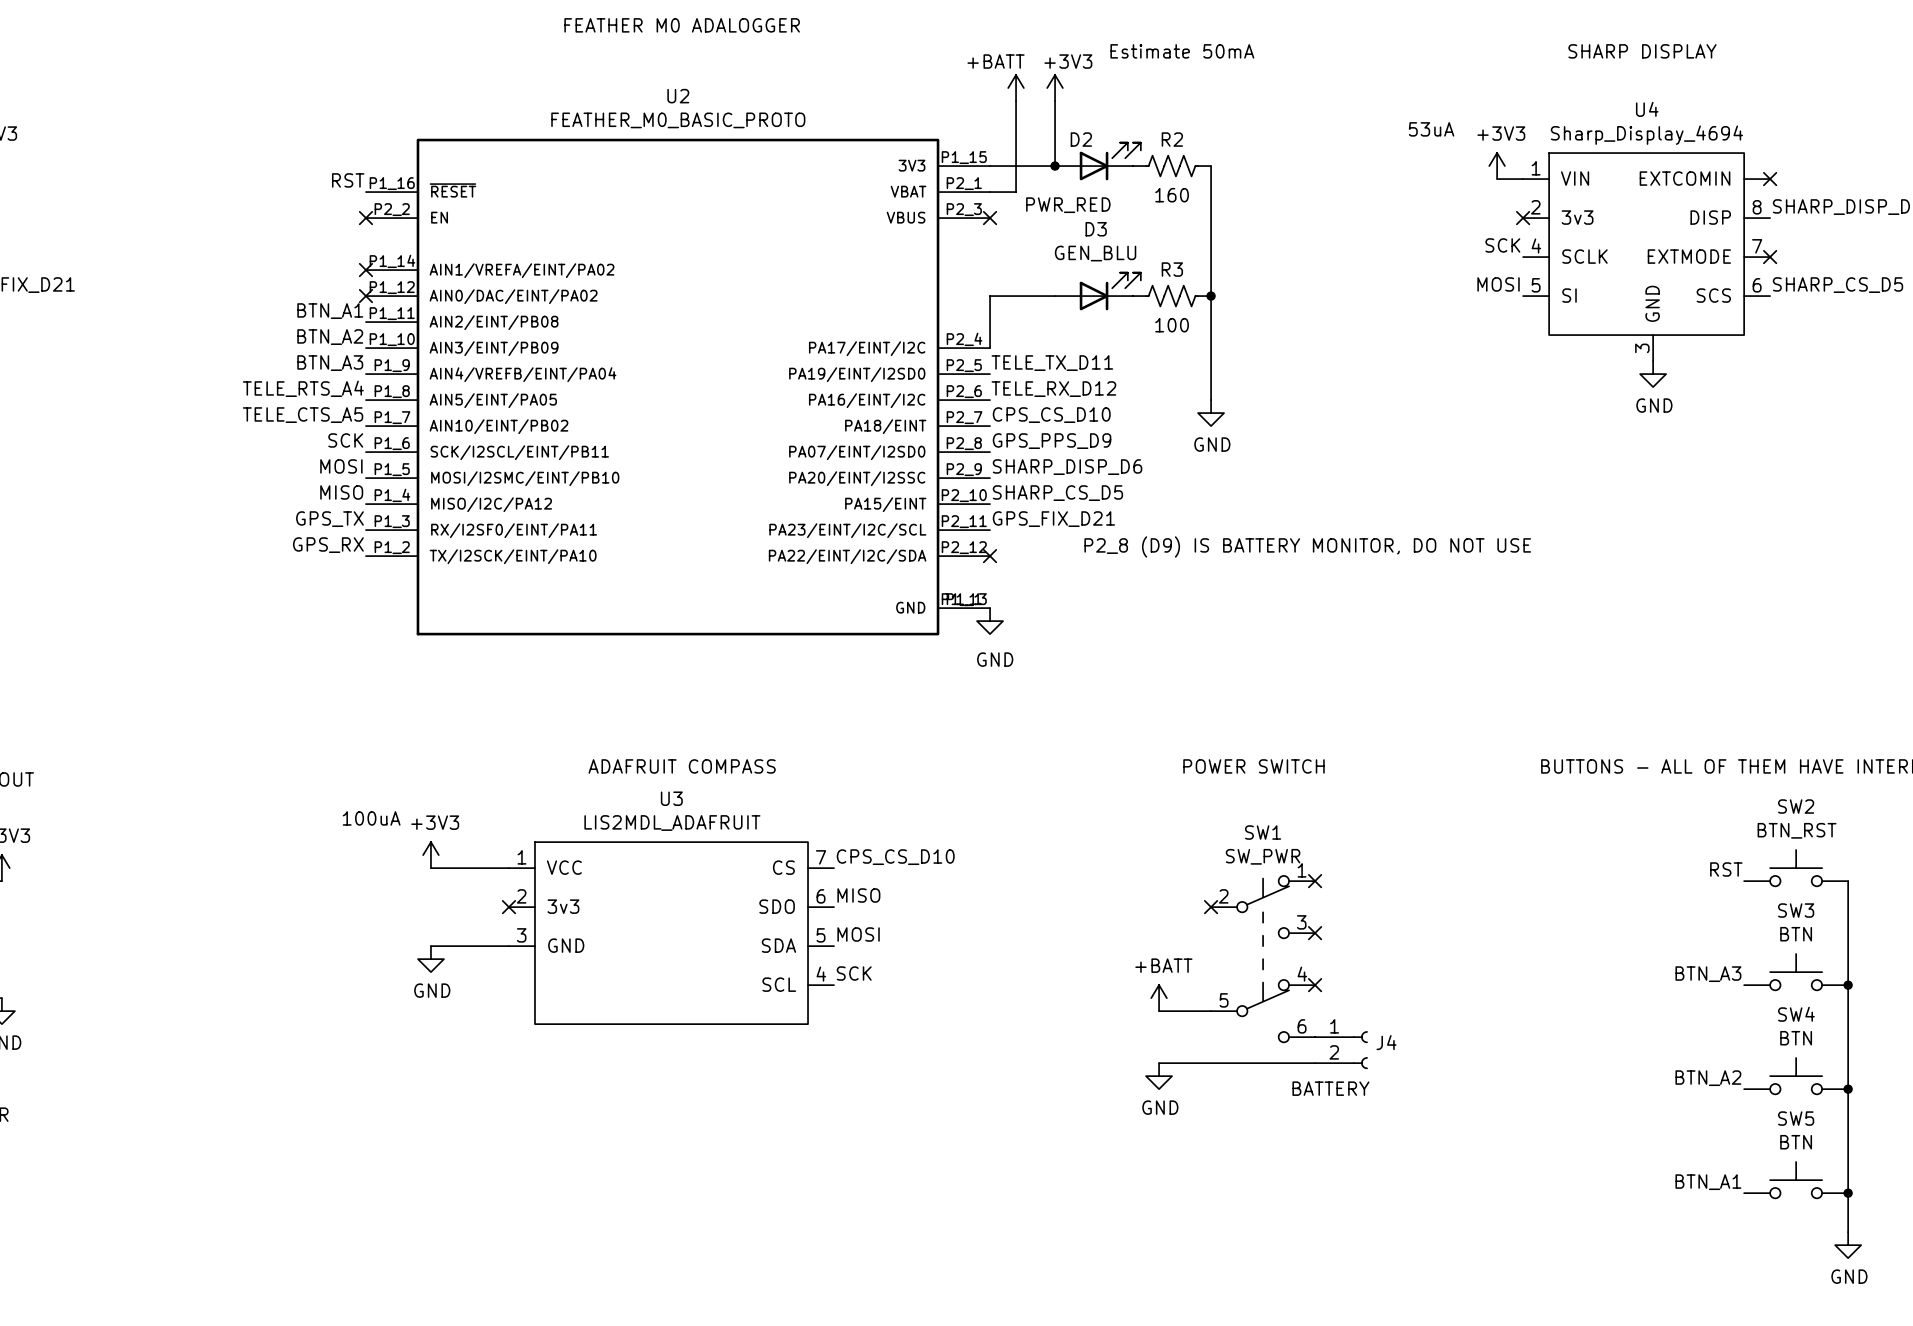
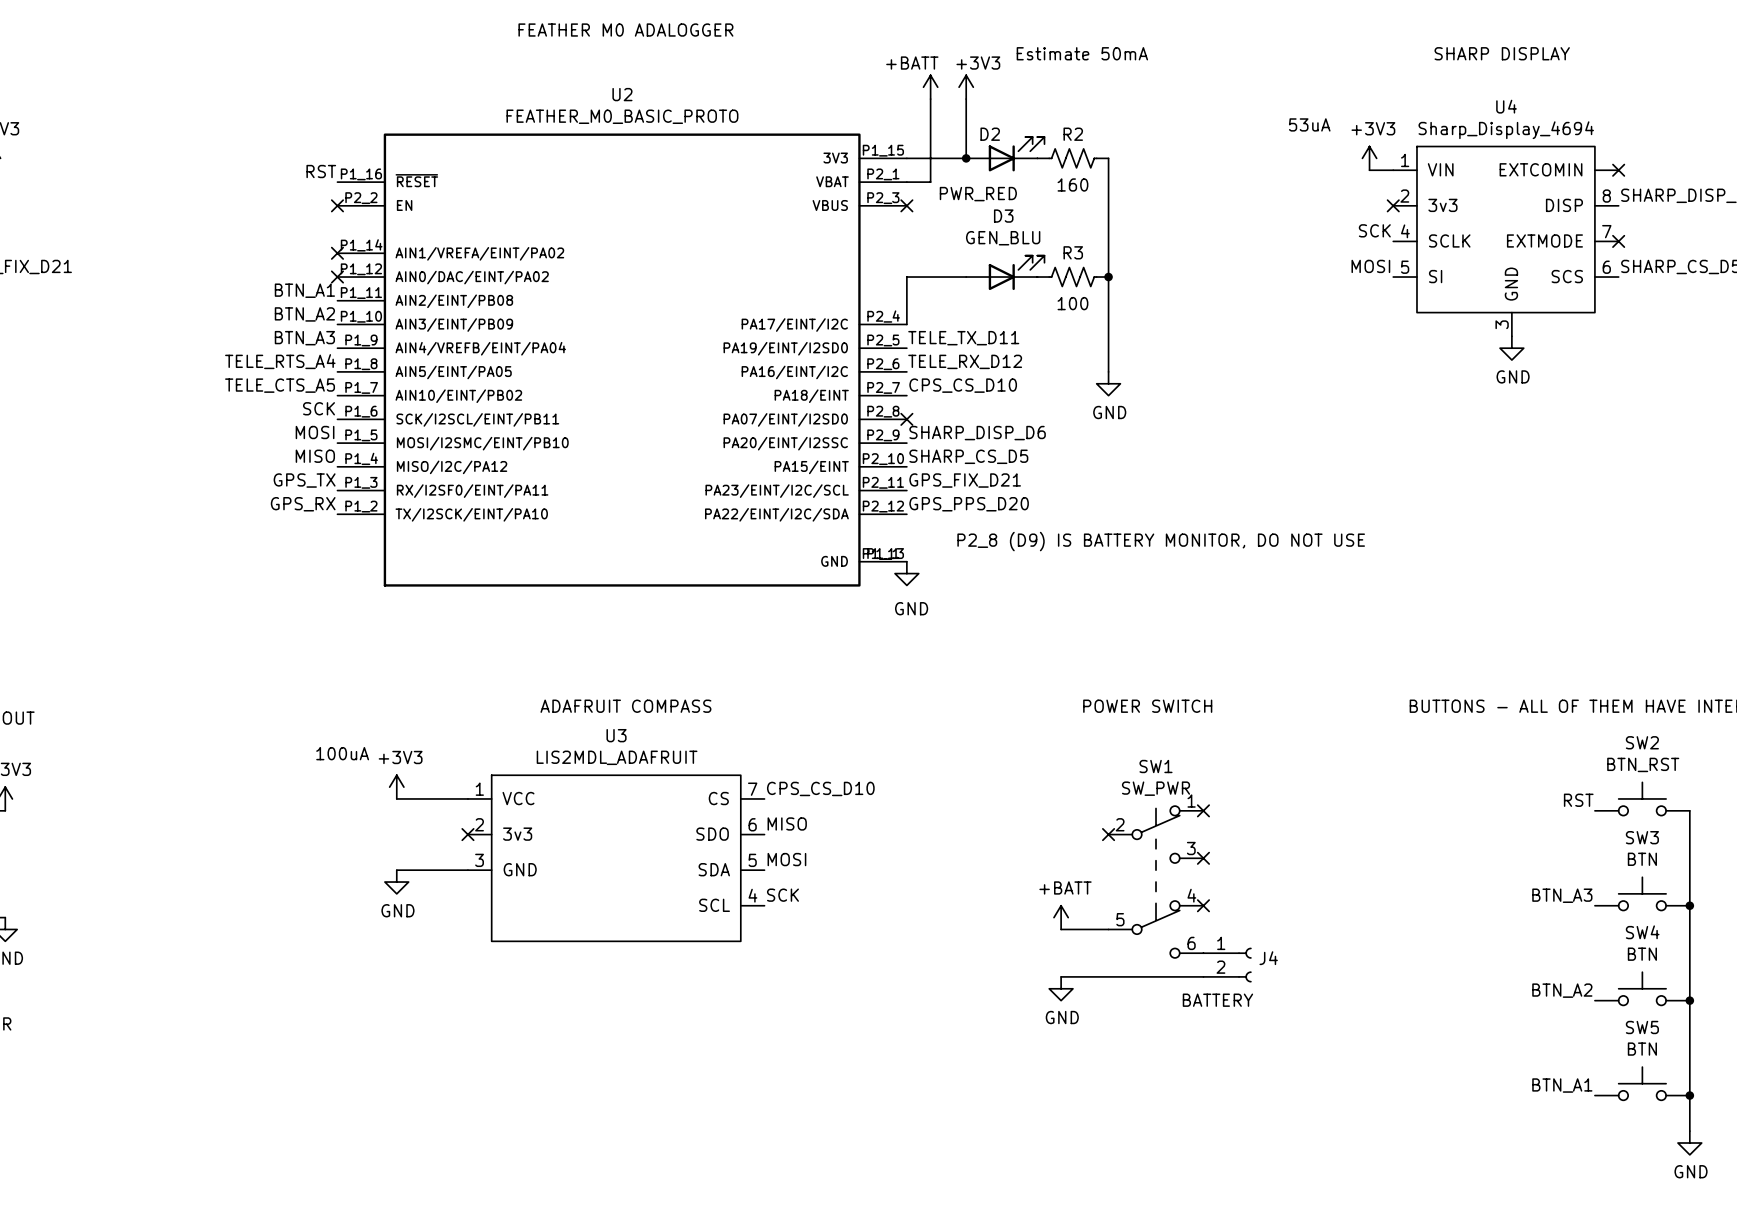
label: GPS_PPS_D9 (1052, 441) -> none
no-connect mark: none -> (906, 419)
label: none -> GPS_PPS_D20 (969, 504)
text position: P2_8 (D9) IS BATTERY MONITOR, DO NOT USE (1307, 546) -> P2_8 (D9) IS BATTERY MONITOR, DO NOT USE (1161, 541)
no-connect mark: (990, 556) -> none

